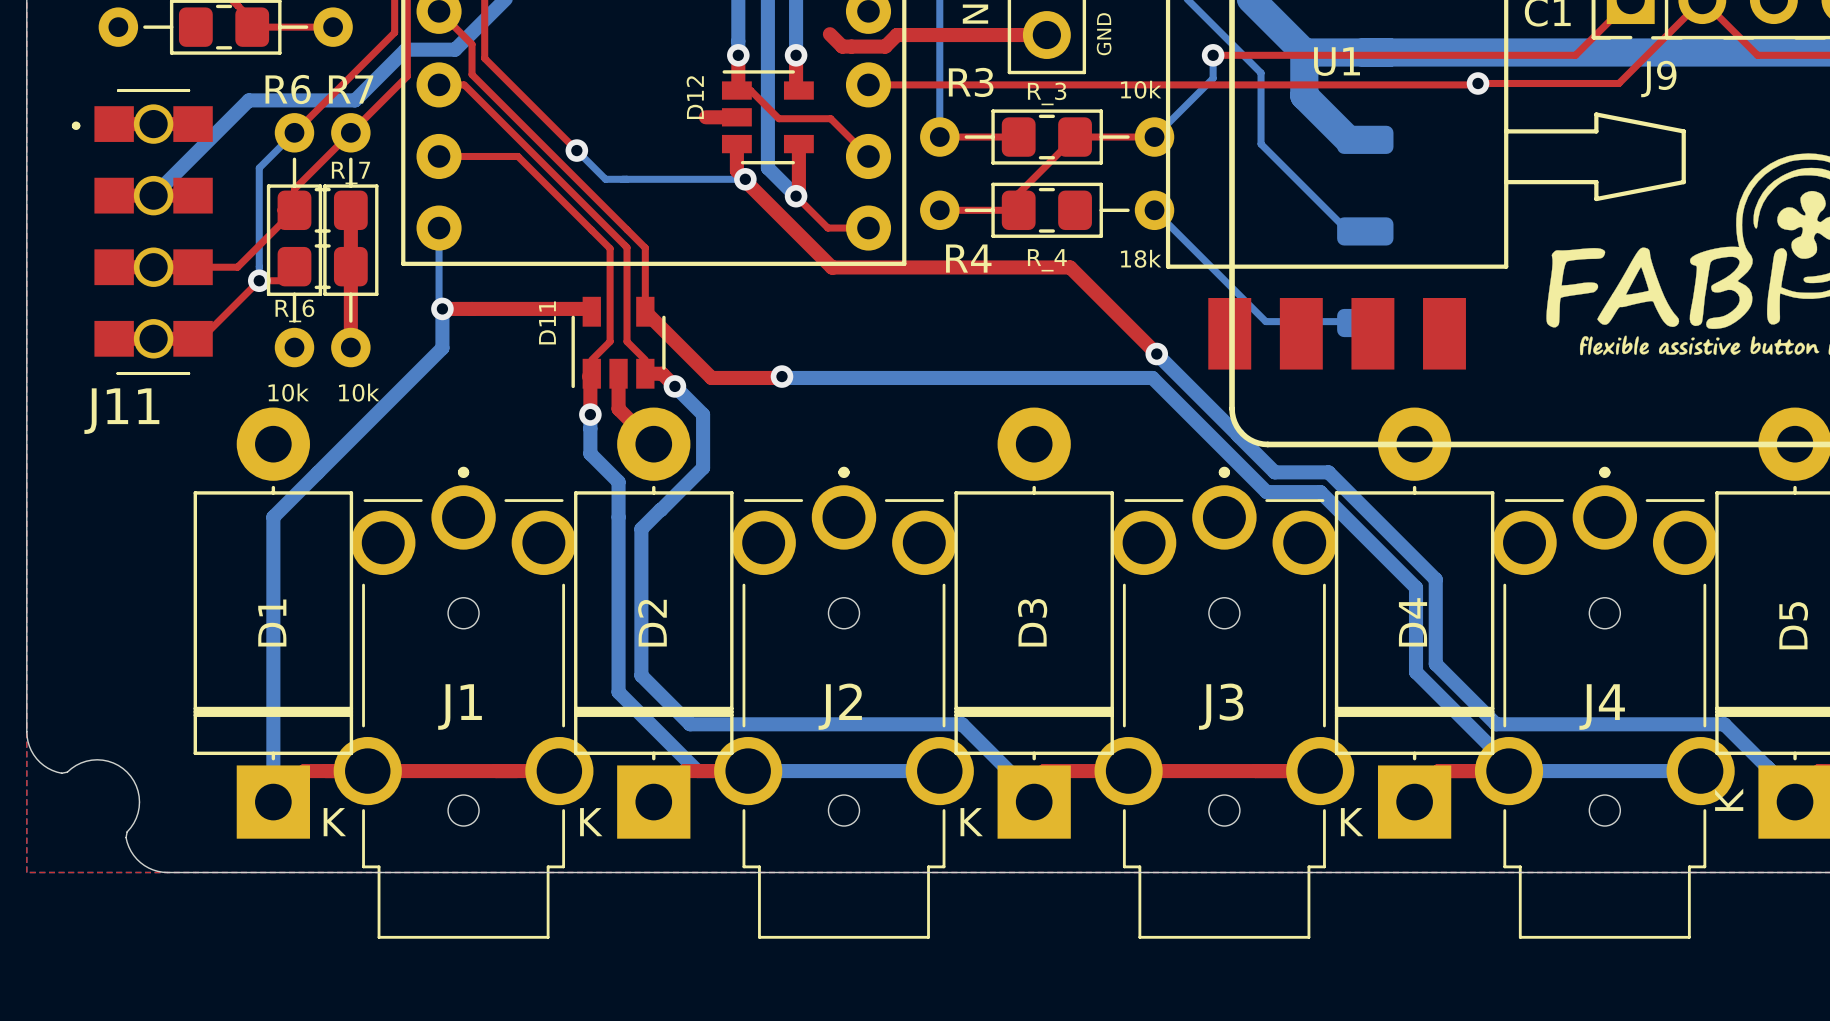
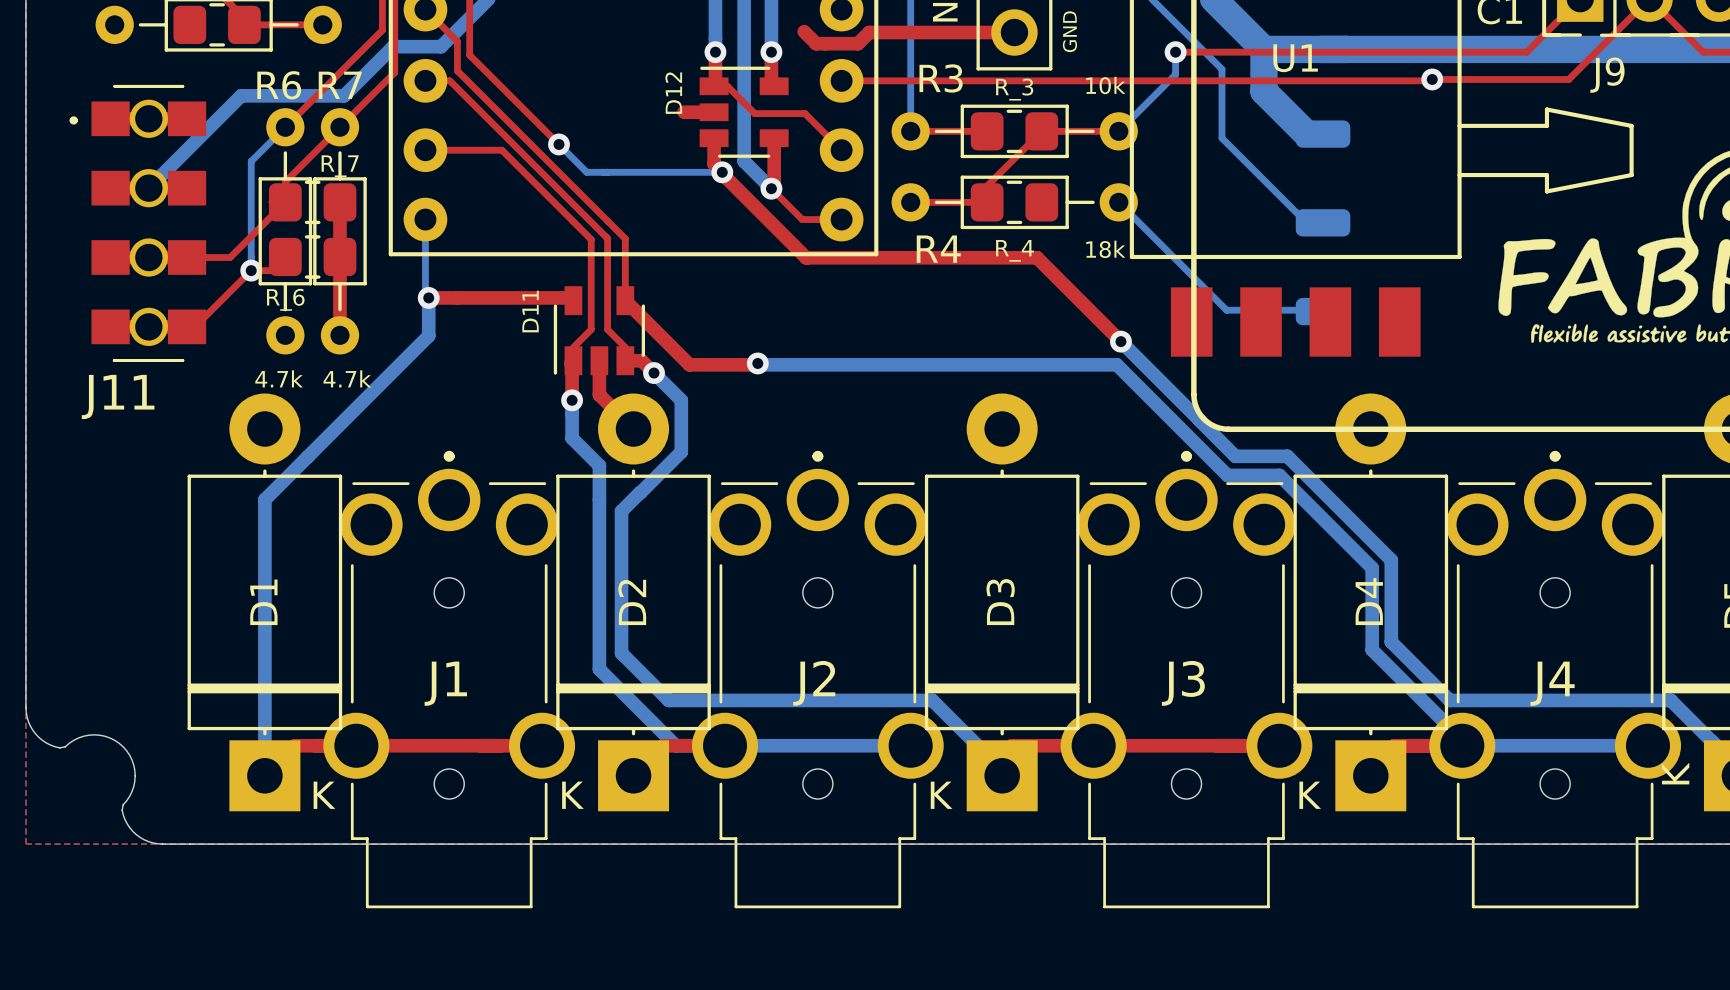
R6 value: 10k (288, 392) -> 4.7k (279, 378)
R7 value: 10k (359, 392) -> 4.7k (347, 378)

